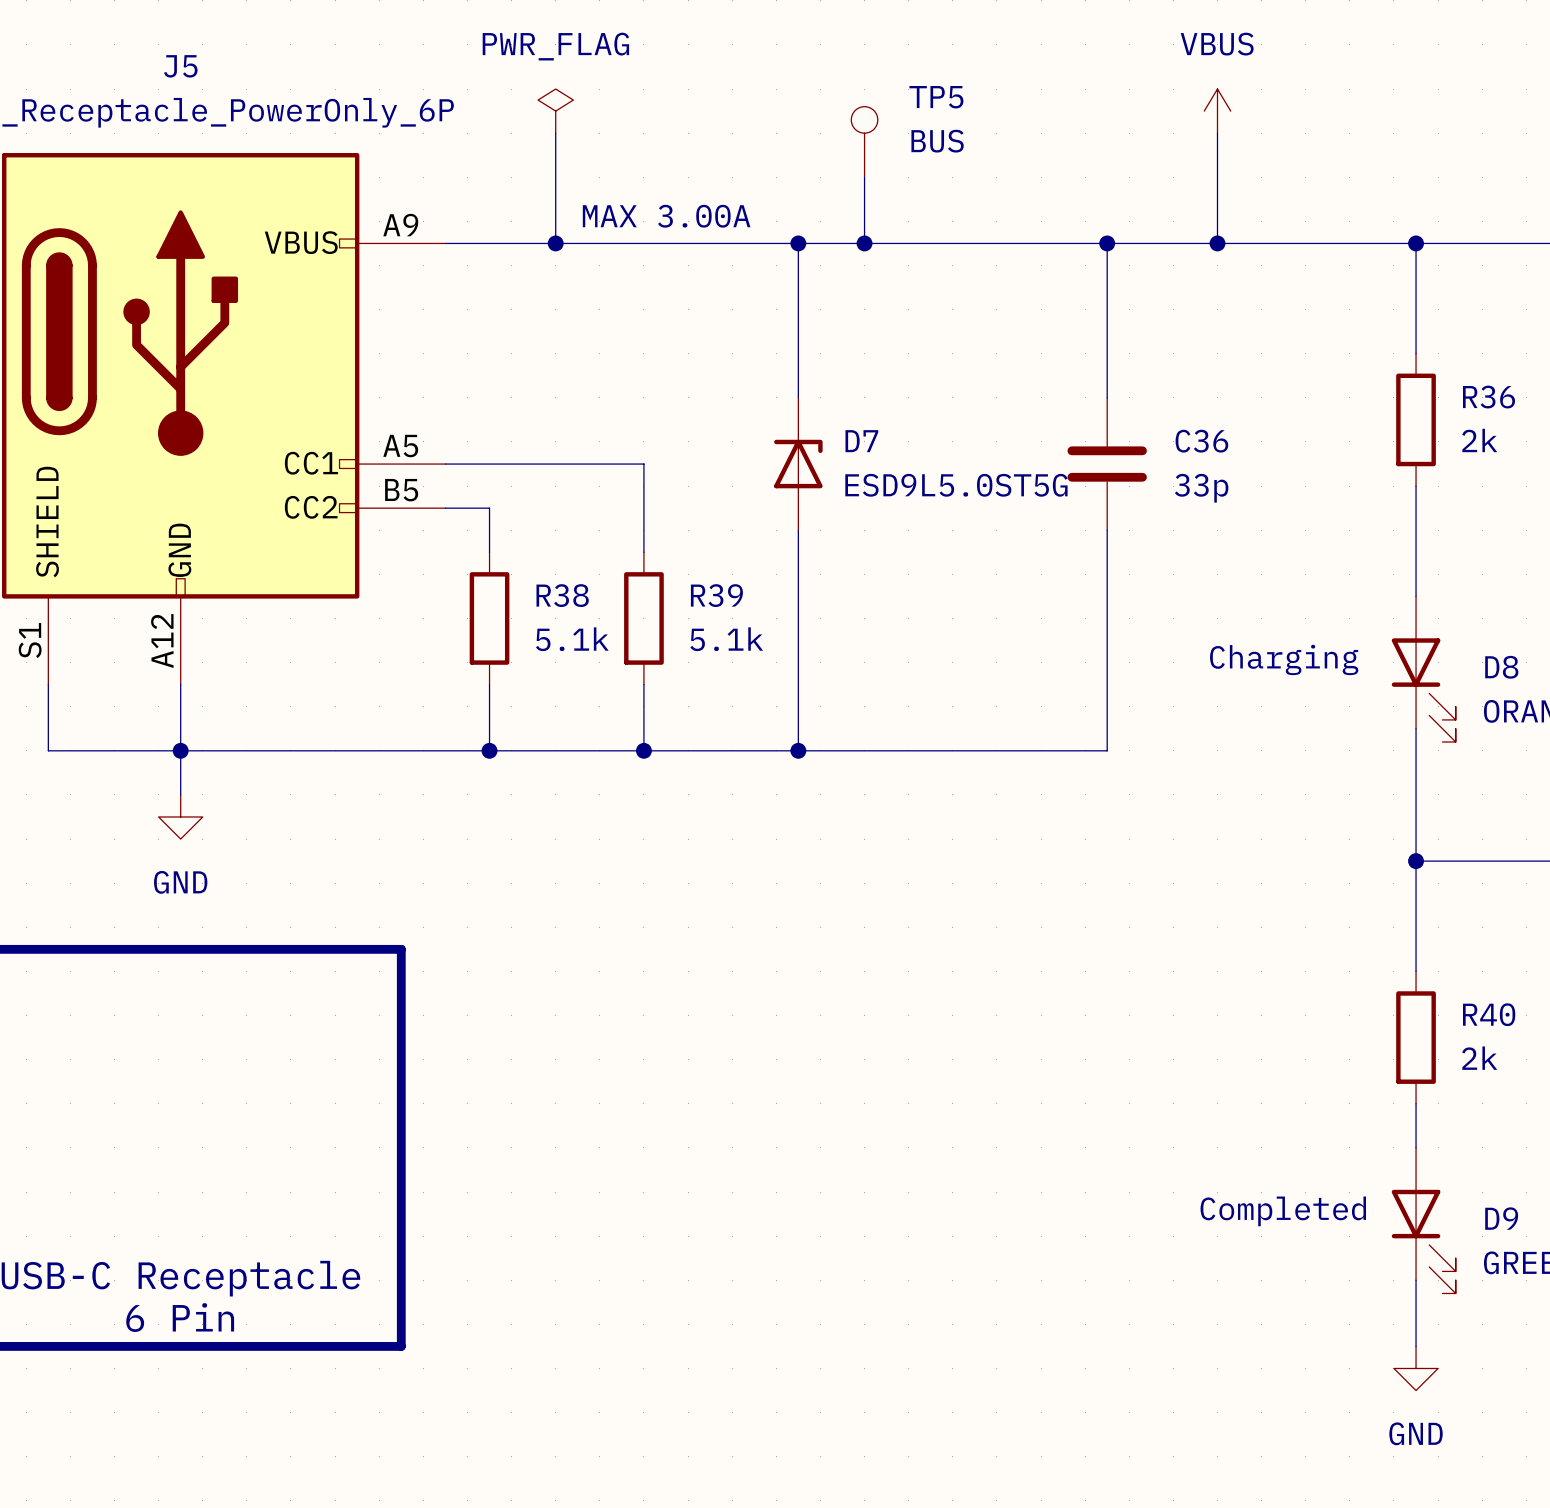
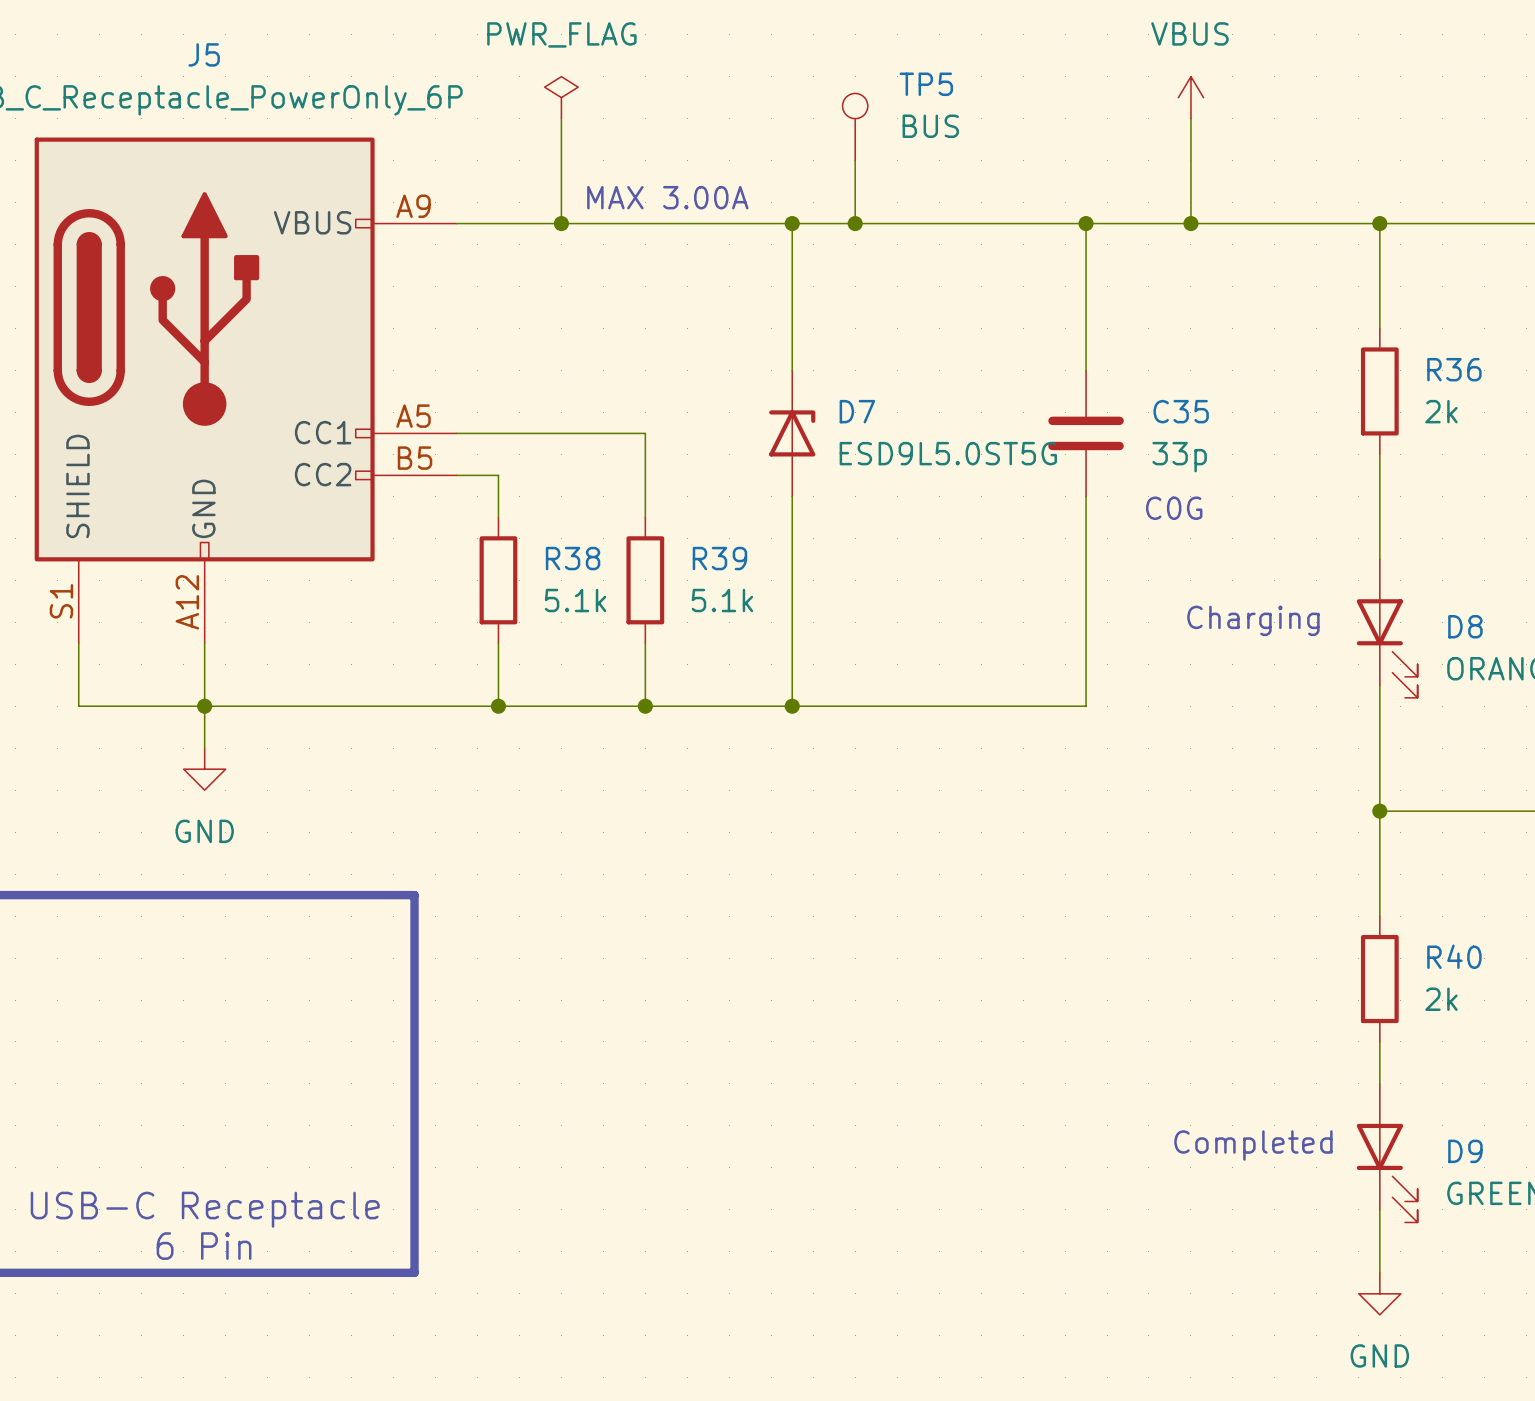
C36 name: C36 (1201, 441) -> C35 (1181, 411)
text: none -> C0G (1174, 508)

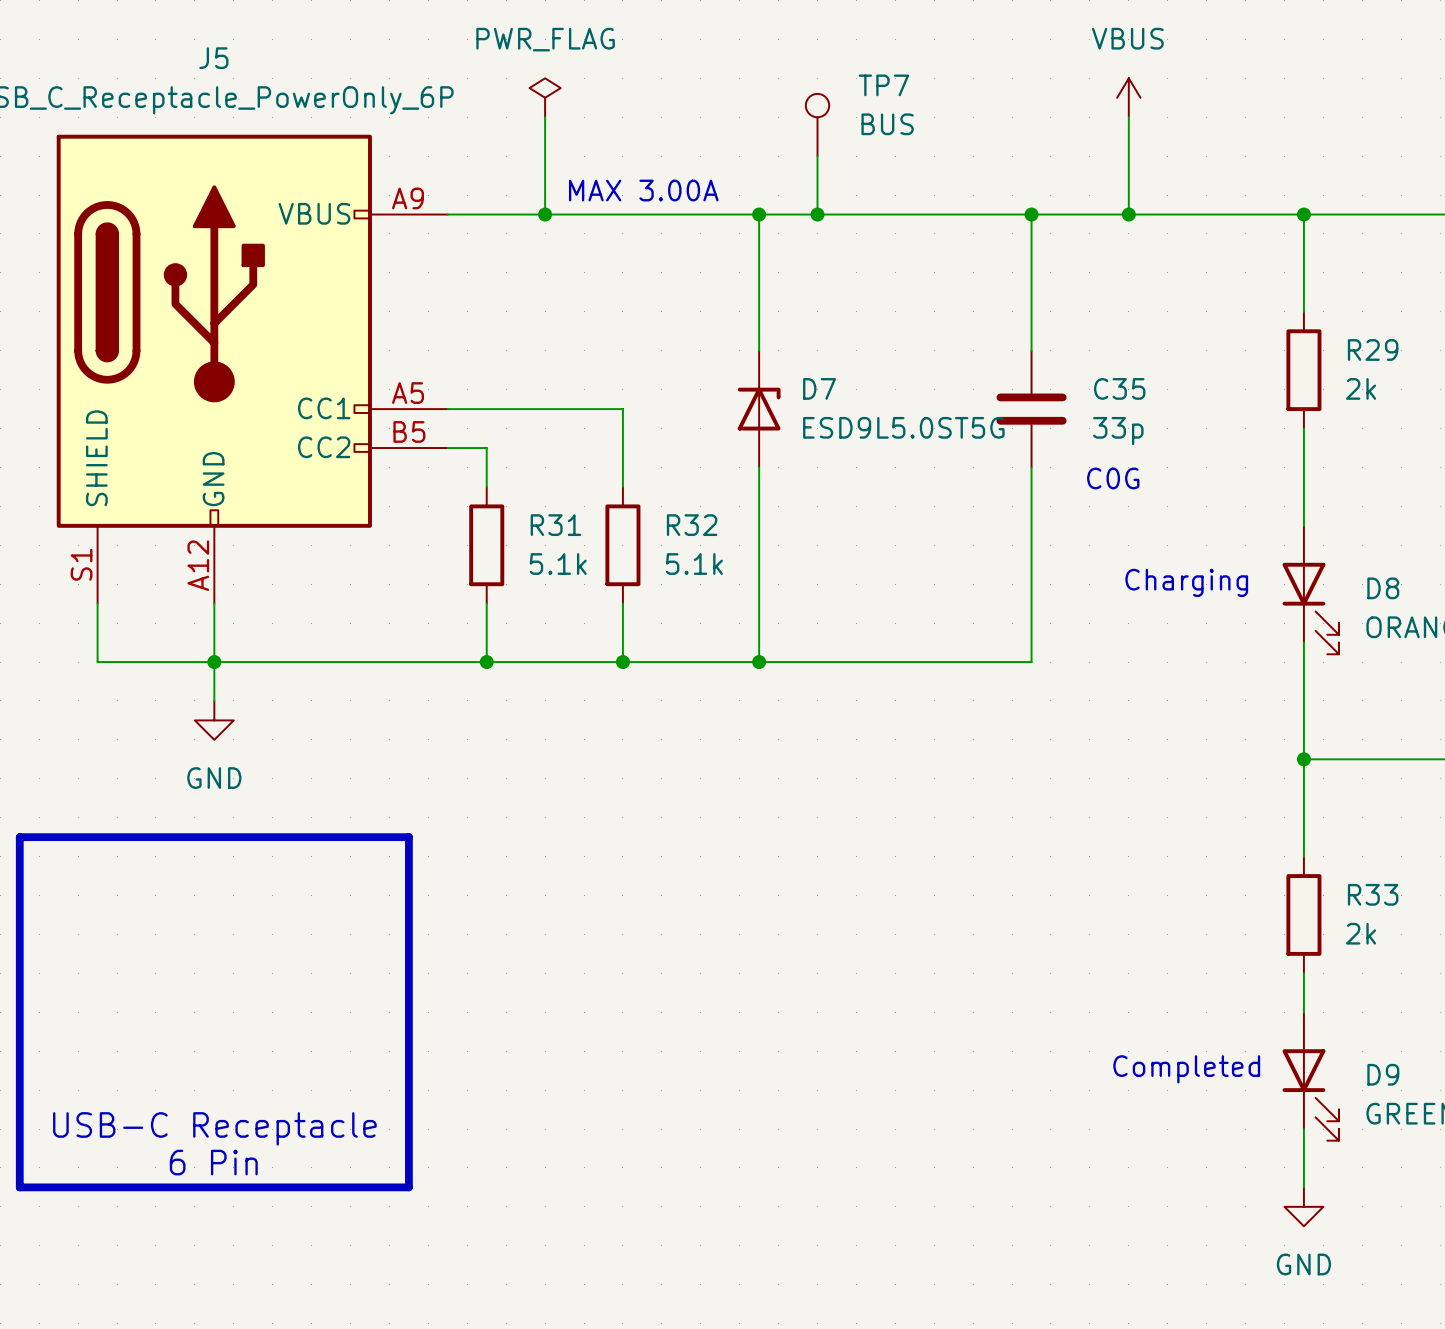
TP5 name: TP5 (926, 84) -> TP7 (883, 85)
R36 name: R36 (1454, 369) -> R29 (1373, 350)
R38 name: R38 (573, 558) -> R31 (555, 525)
R39 name: R39 (719, 558) -> R32 (692, 525)
R40 name: R40 (1454, 956) -> R33 (1373, 894)

